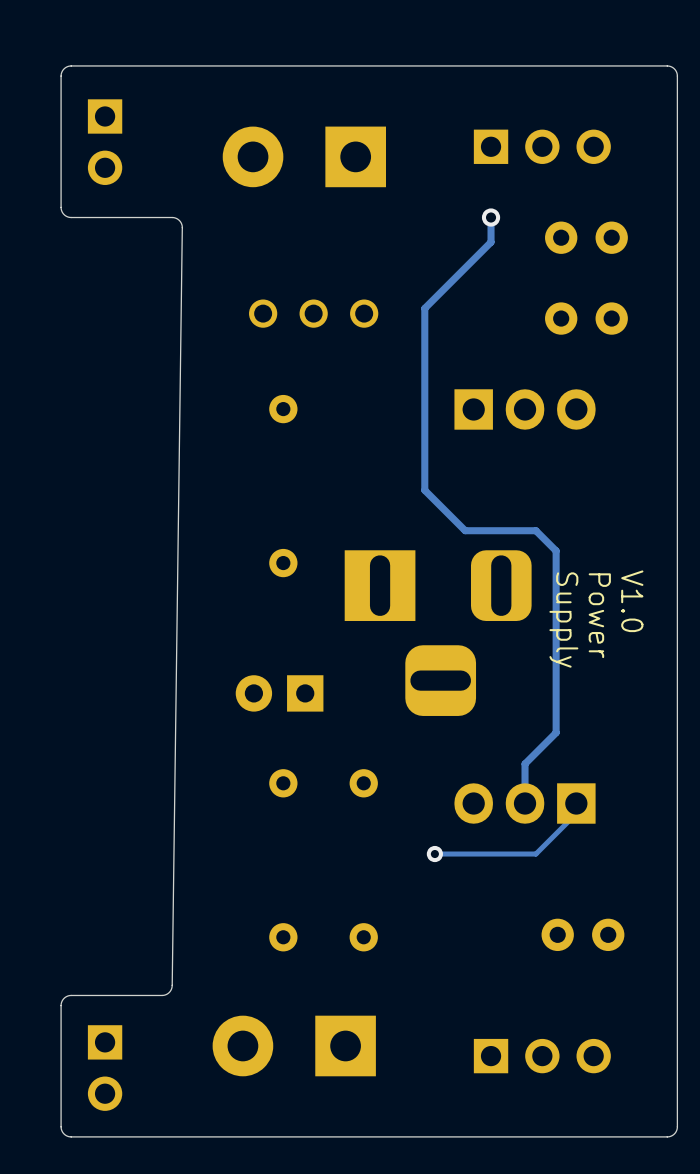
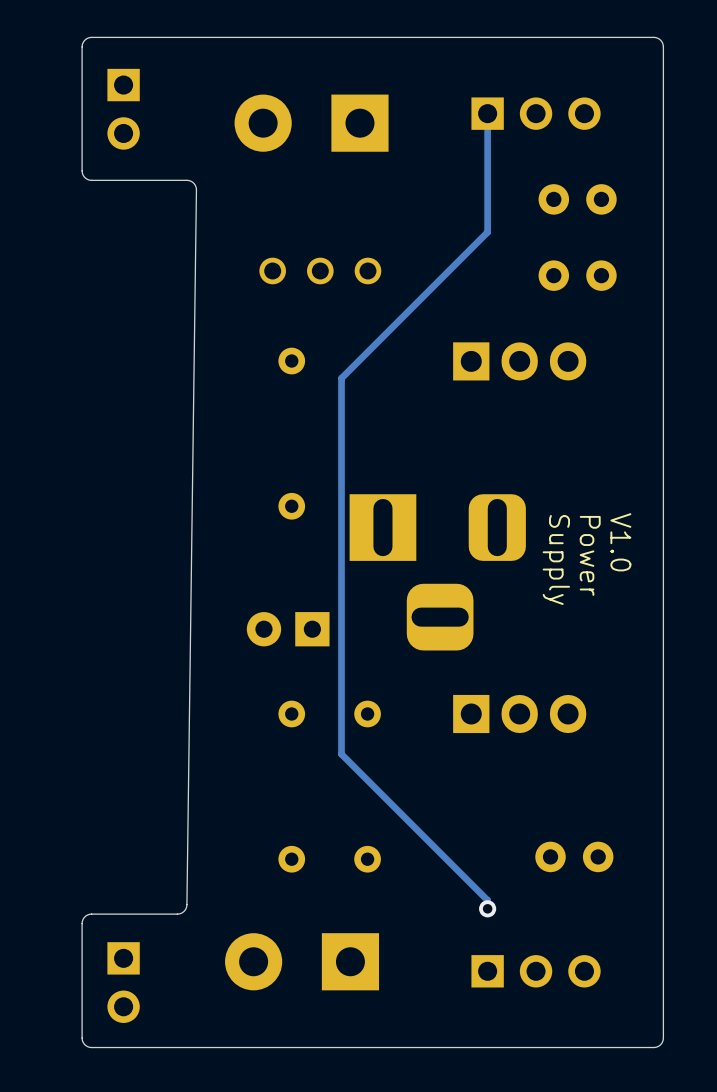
track: none -> (487, 113) (487, 180)
via: (491, 217) -> none
track: (491, 242) (424, 308) (424, 490) (465, 530) (535, 530) (556, 550) (556, 732) (525, 763) (525, 803) -> (487, 203) (487, 232) (341, 378) (341, 754) (487, 900) (487, 908)
part rotation: 0° (525, 803) -> 180° (519, 713)
track: (576, 803) (576, 813) (535, 854) (434, 854) -> none
via: (434, 854) -> none
via: none -> (487, 908)

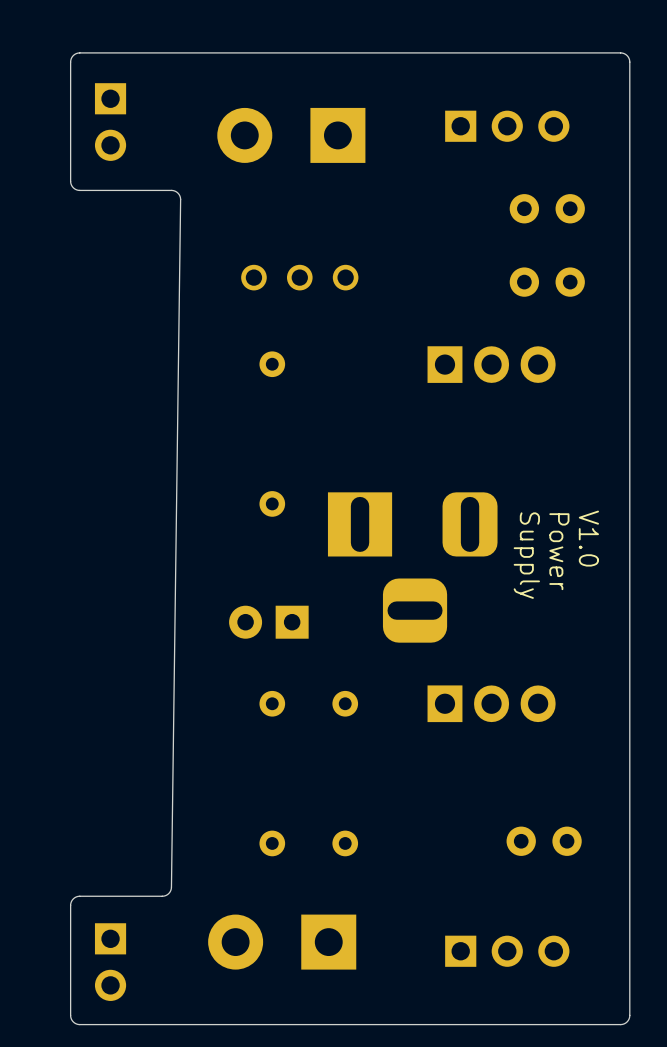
track: (487, 113) (487, 232) (341, 378) (341, 754) (487, 900) (487, 908) -> none
via: (487, 908) -> none

